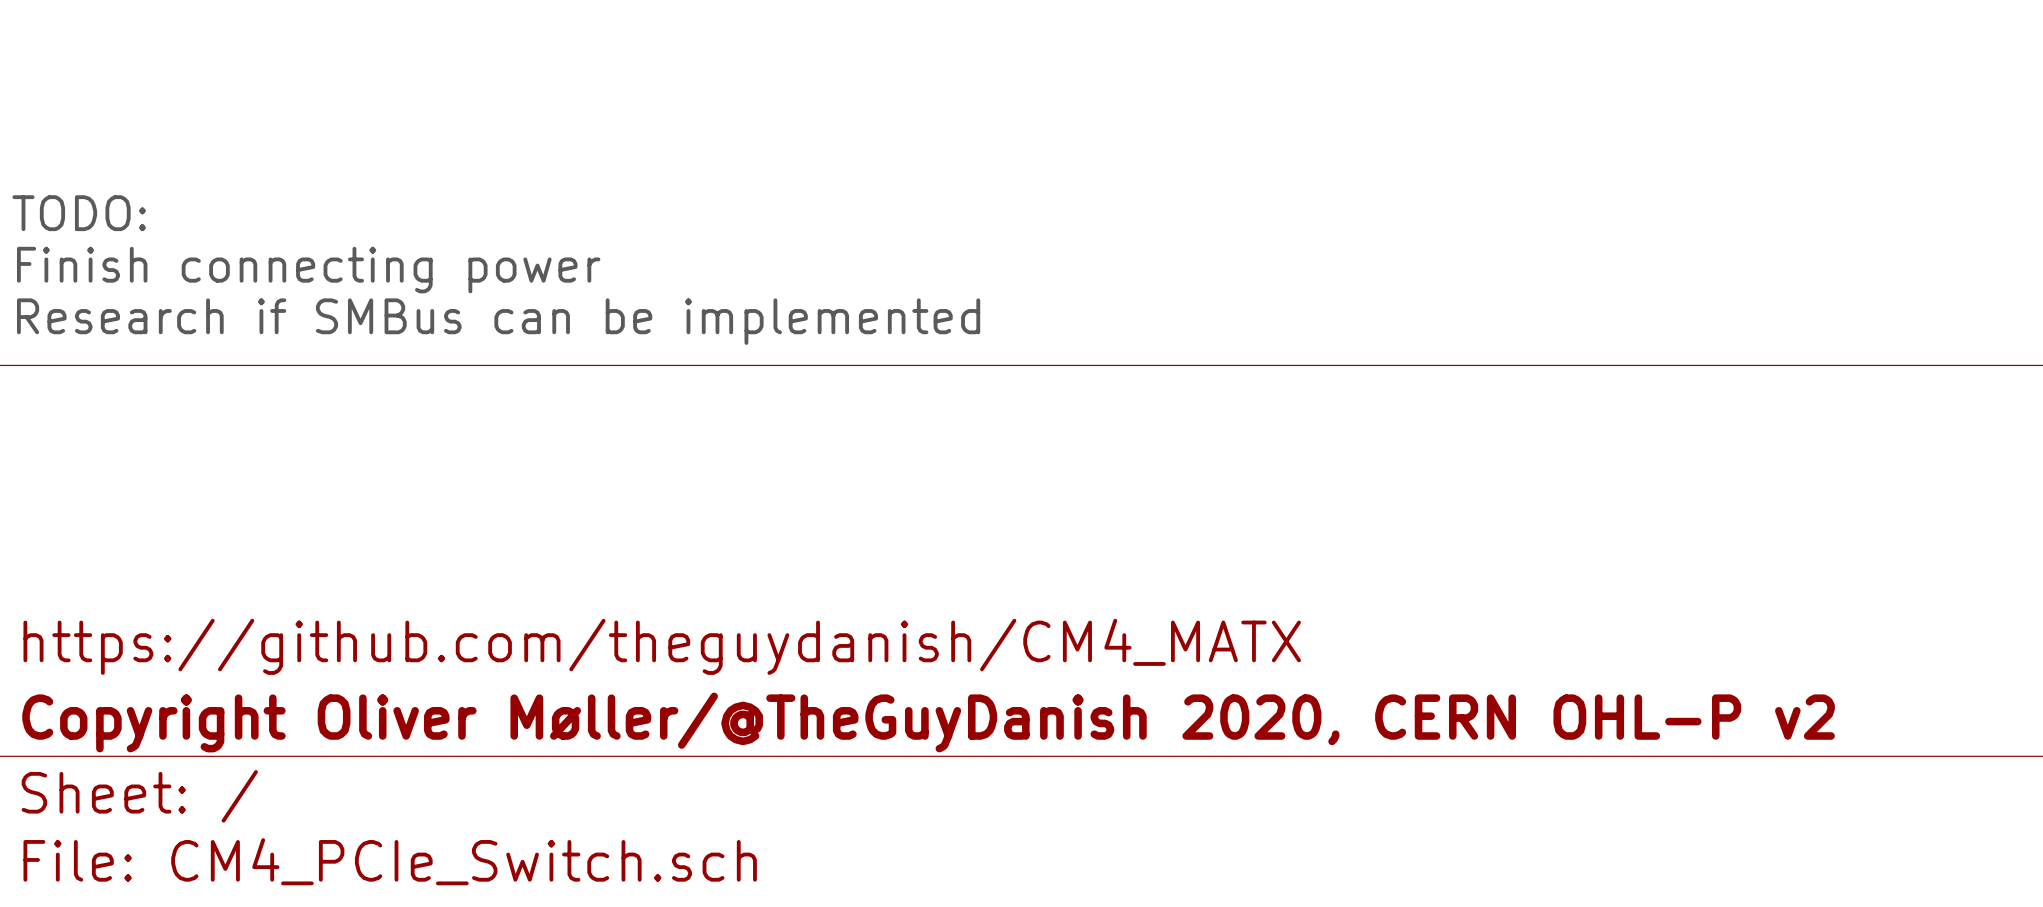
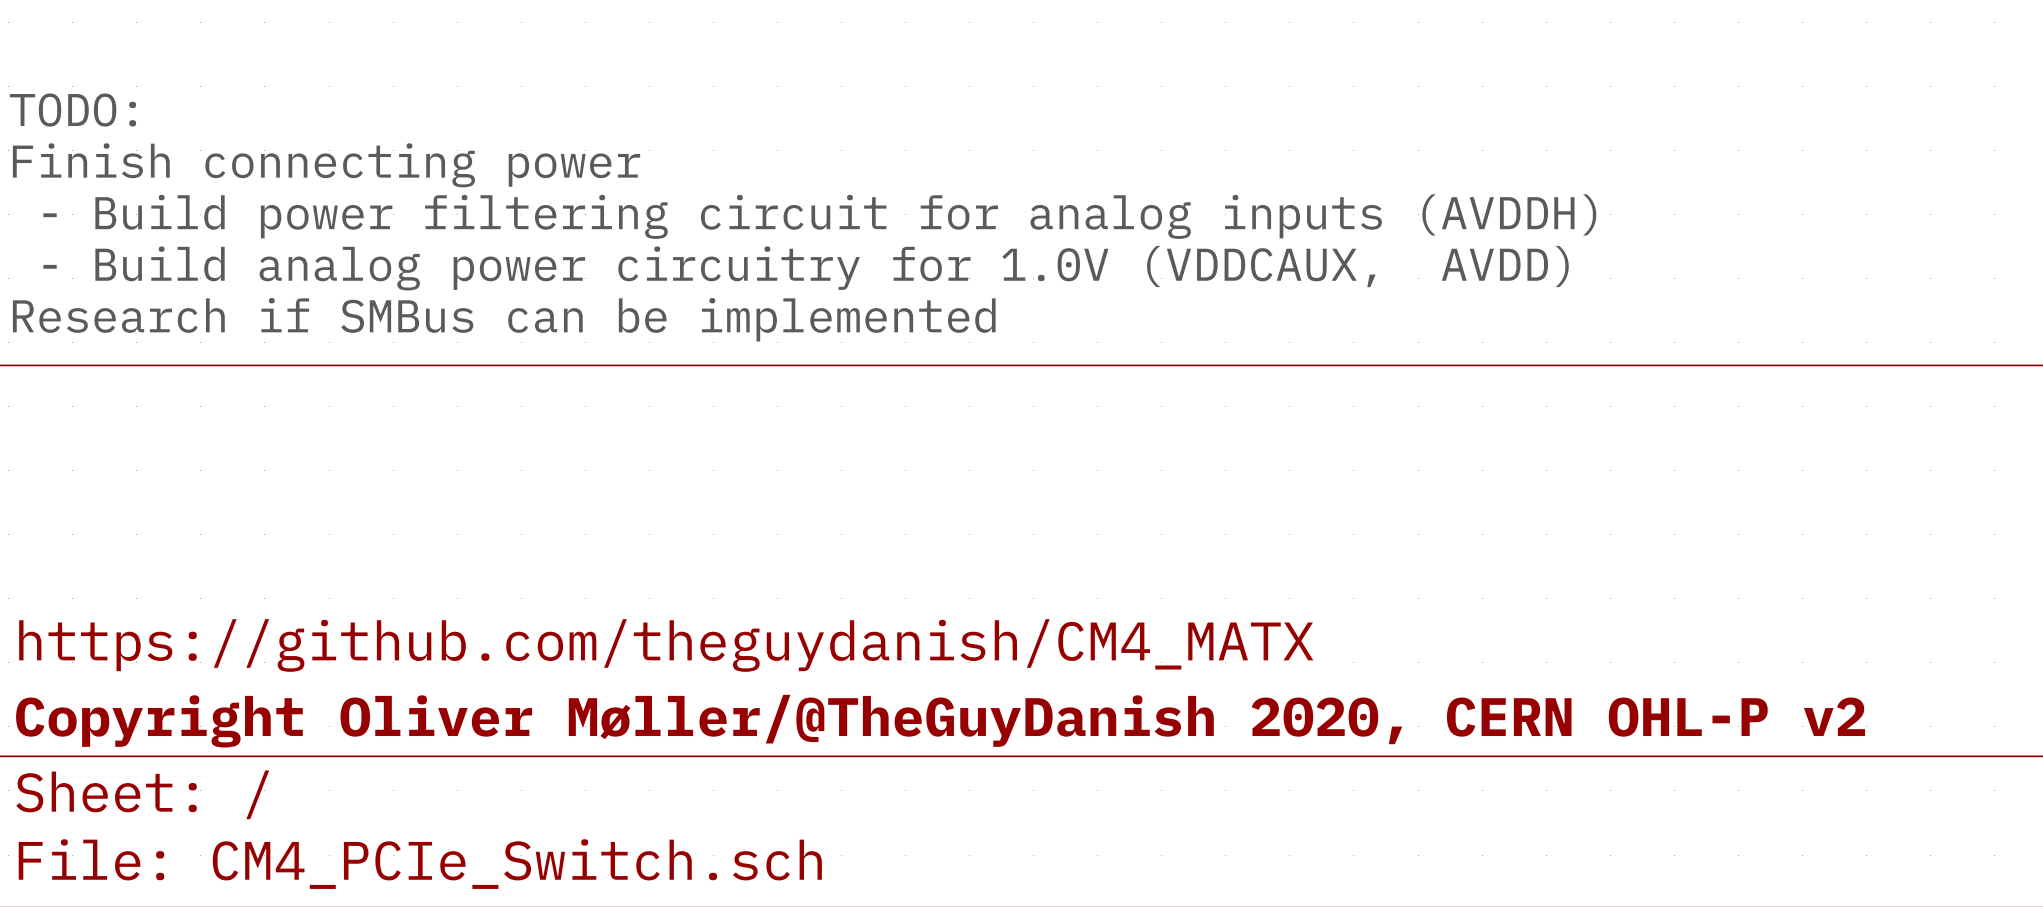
text: none -> TODO: (72, 110)
text: none -> Finish connecting power (326, 165)
text: TODO: (79, 213) -> - Build power filtering circuit for analog inputs (AVDDH) (819, 216)
text: Finish connecting power (308, 270) -> - Build analog power circuitry for 1.0V (VDDCAUX, AVDD) (806, 268)

